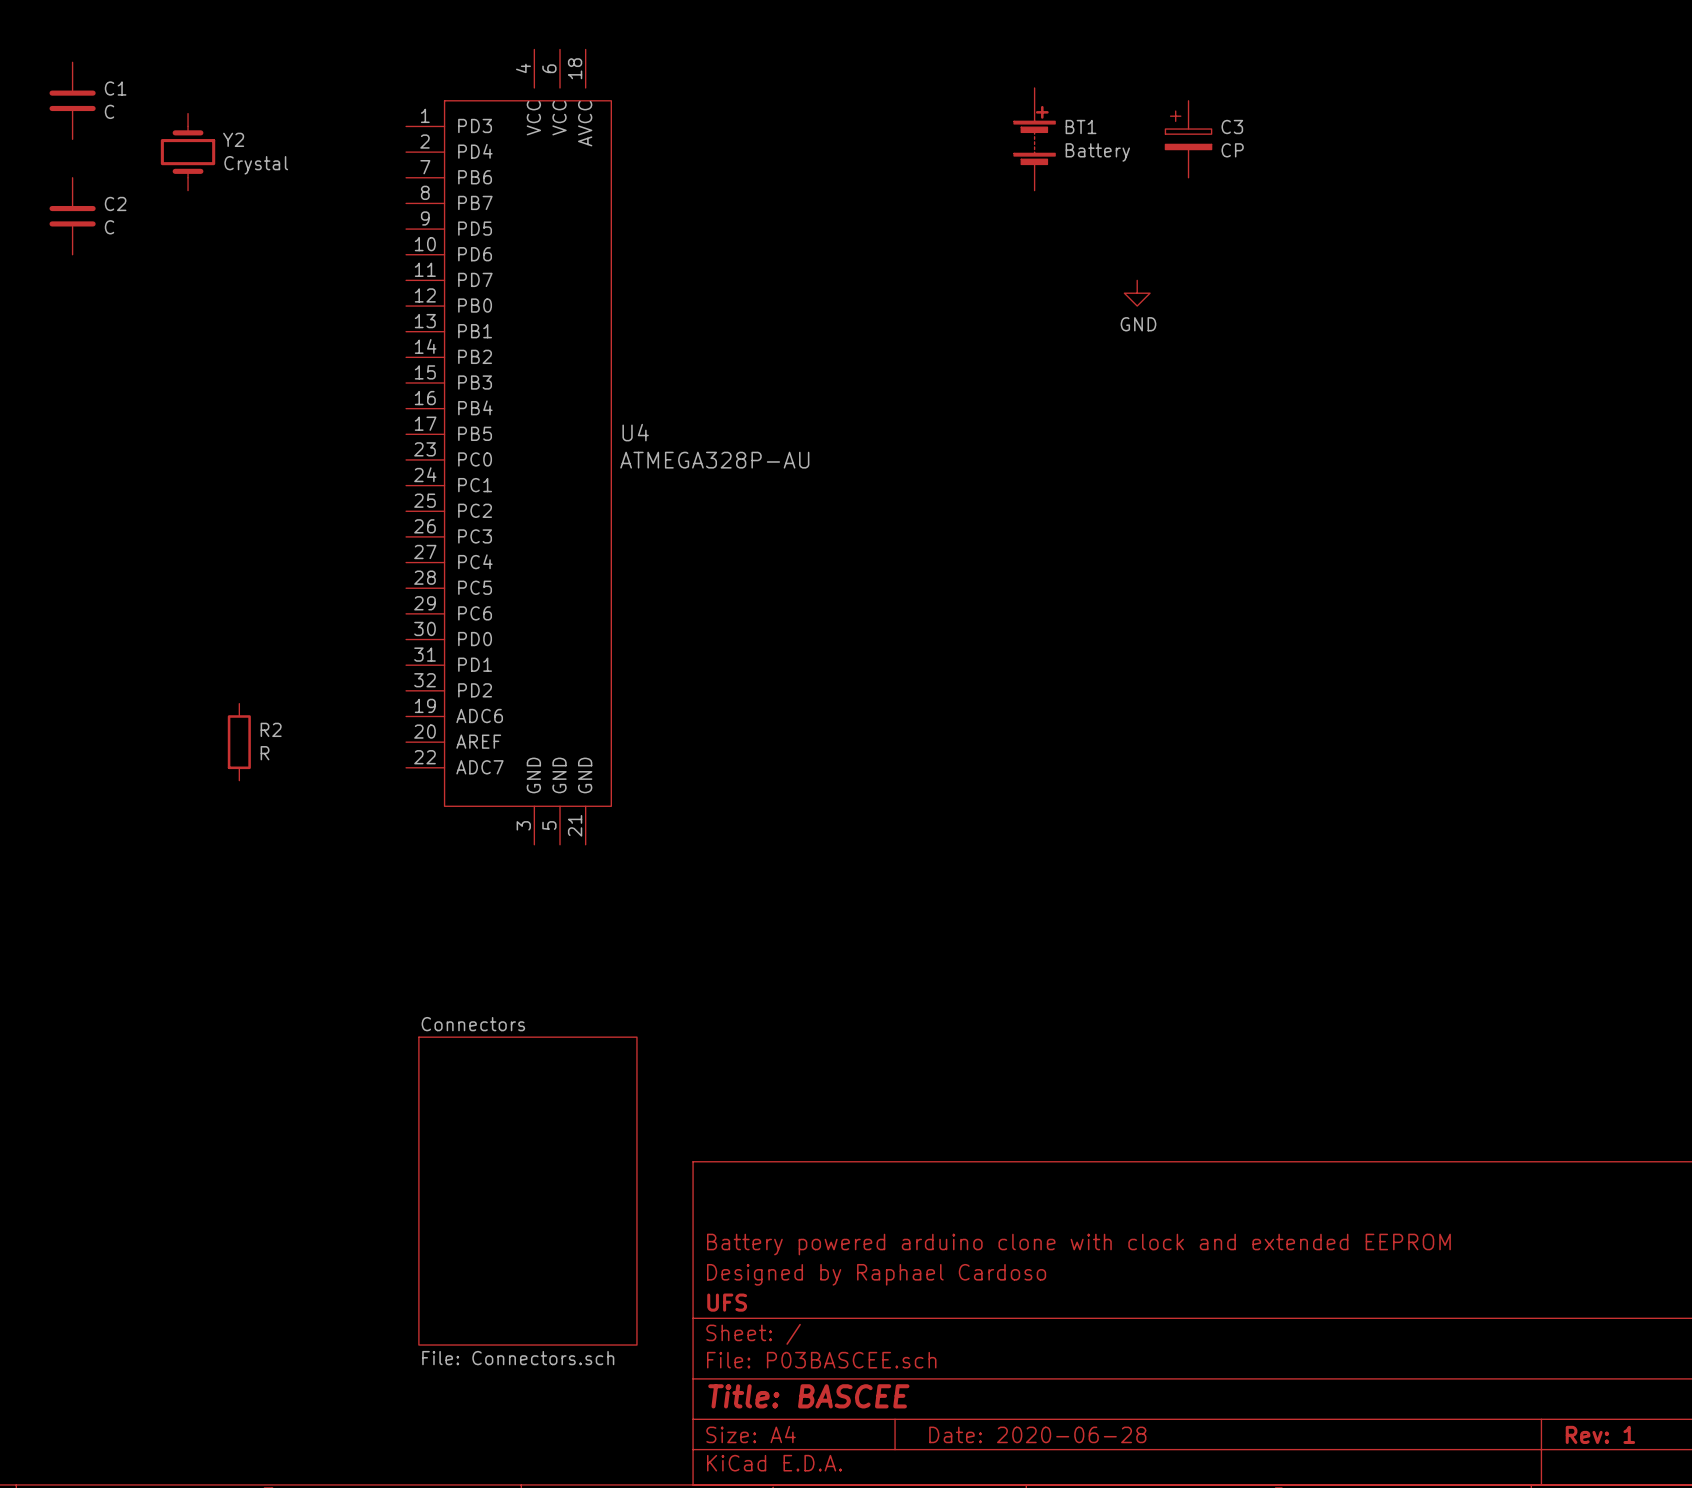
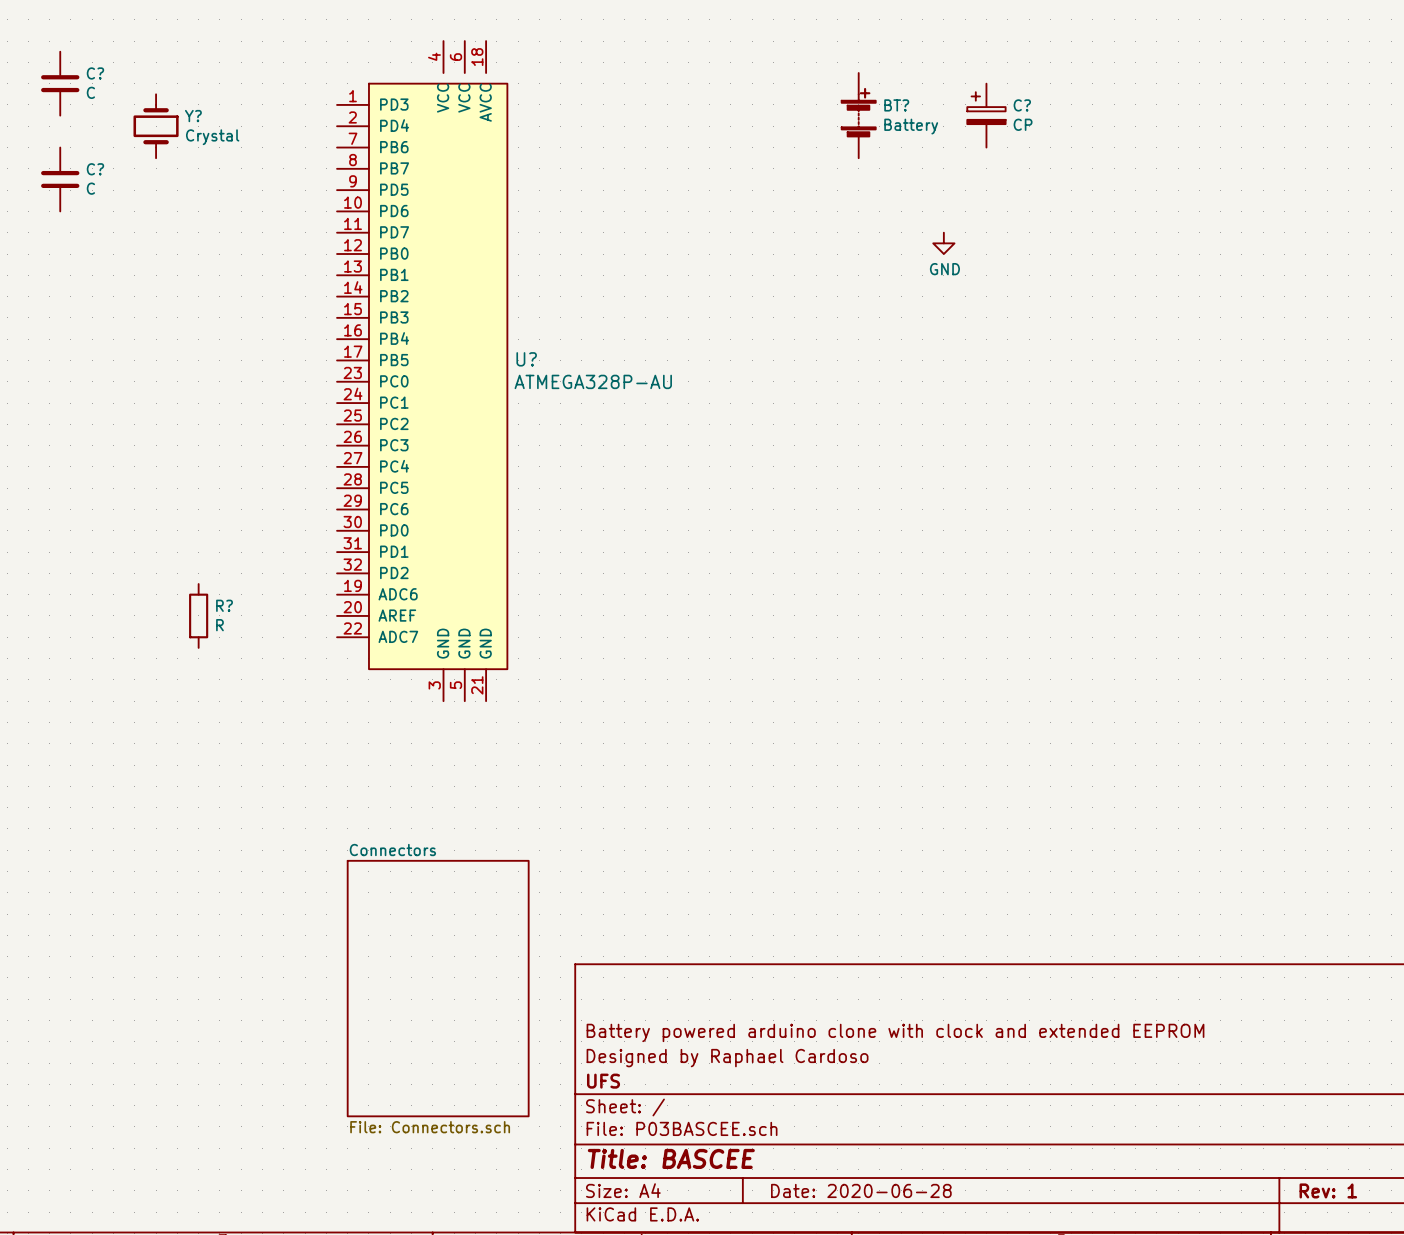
C1 name: C1 (115, 88) -> C? (95, 73)
BT1 name: BT1 (1081, 127) -> BT? (896, 105)
C3 name: C3 (1232, 127) -> C? (1022, 105)
Y2 name: Y2 (233, 139) -> Y? (193, 116)
C2 name: C2 (115, 203) -> C? (95, 169)
U4 name: U4 (635, 432) -> U? (526, 359)
R2 name: R2 (271, 729) -> R? (224, 605)

